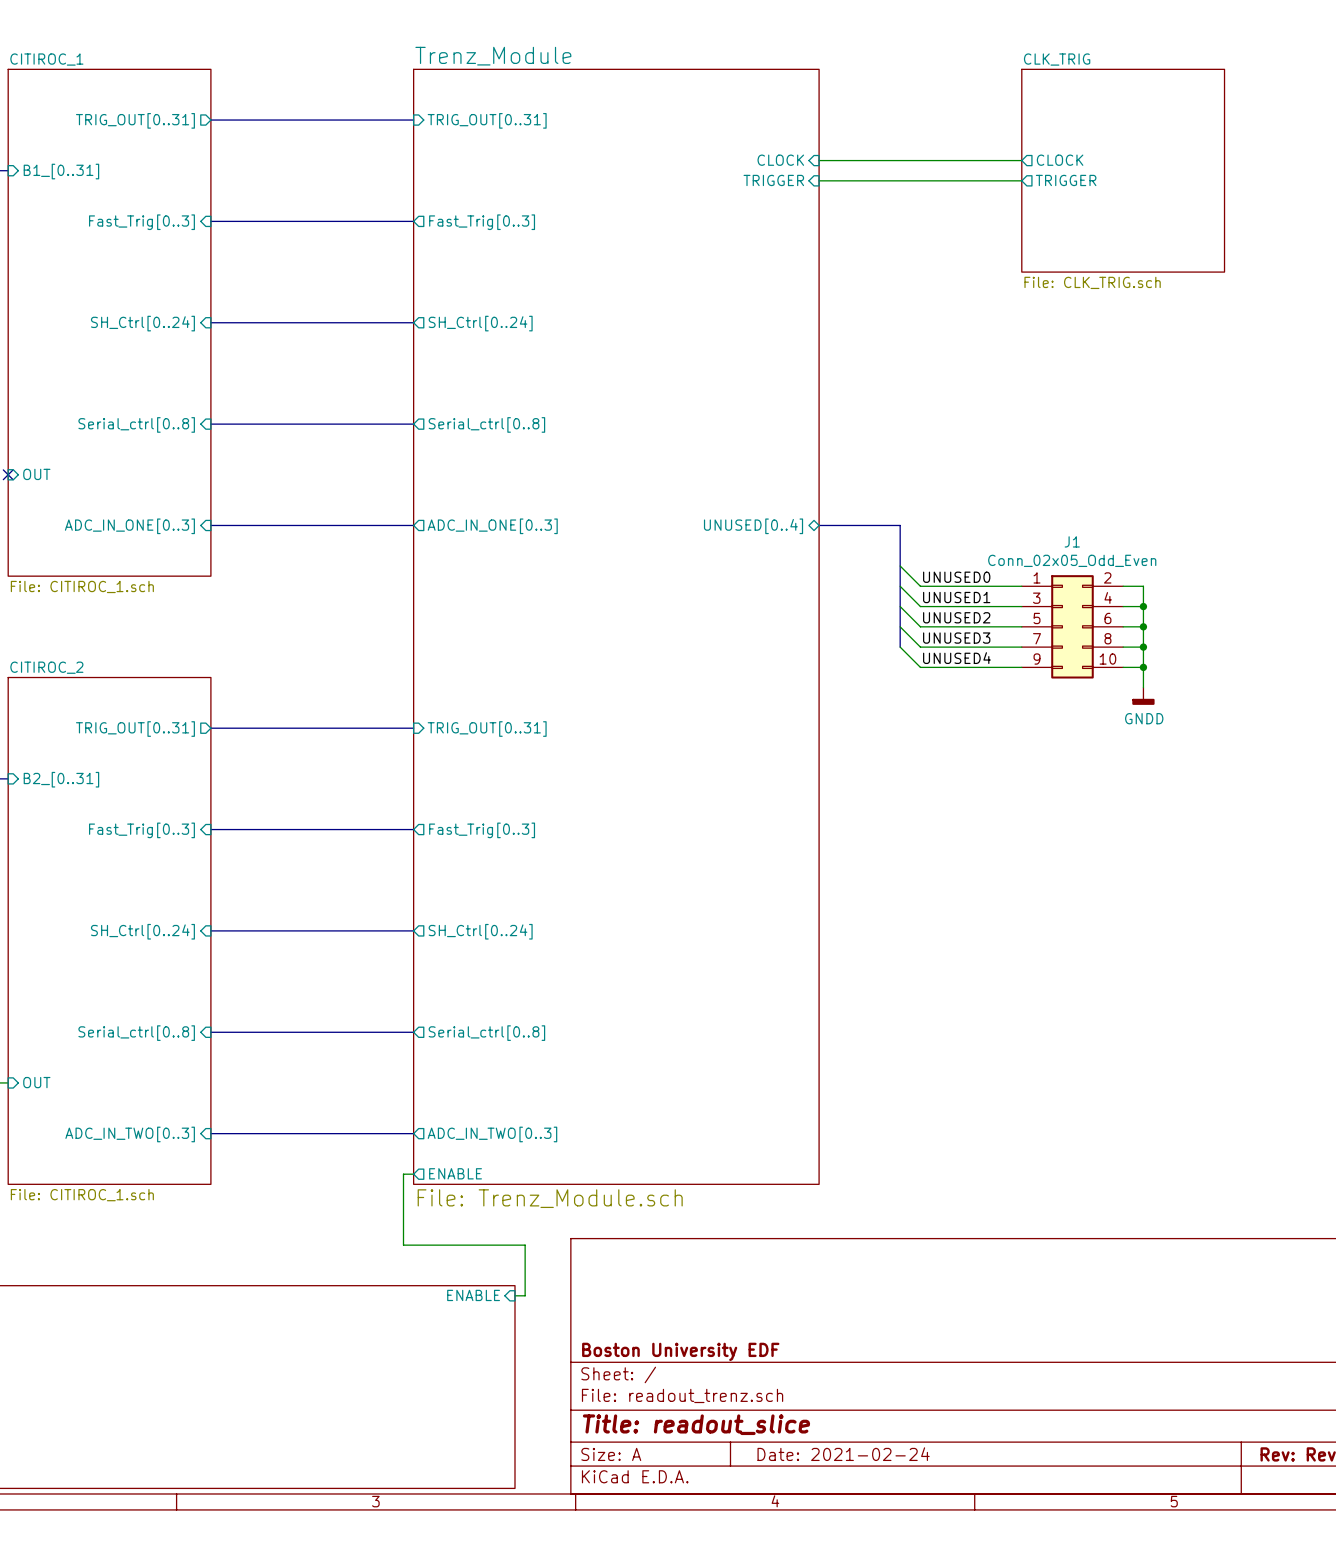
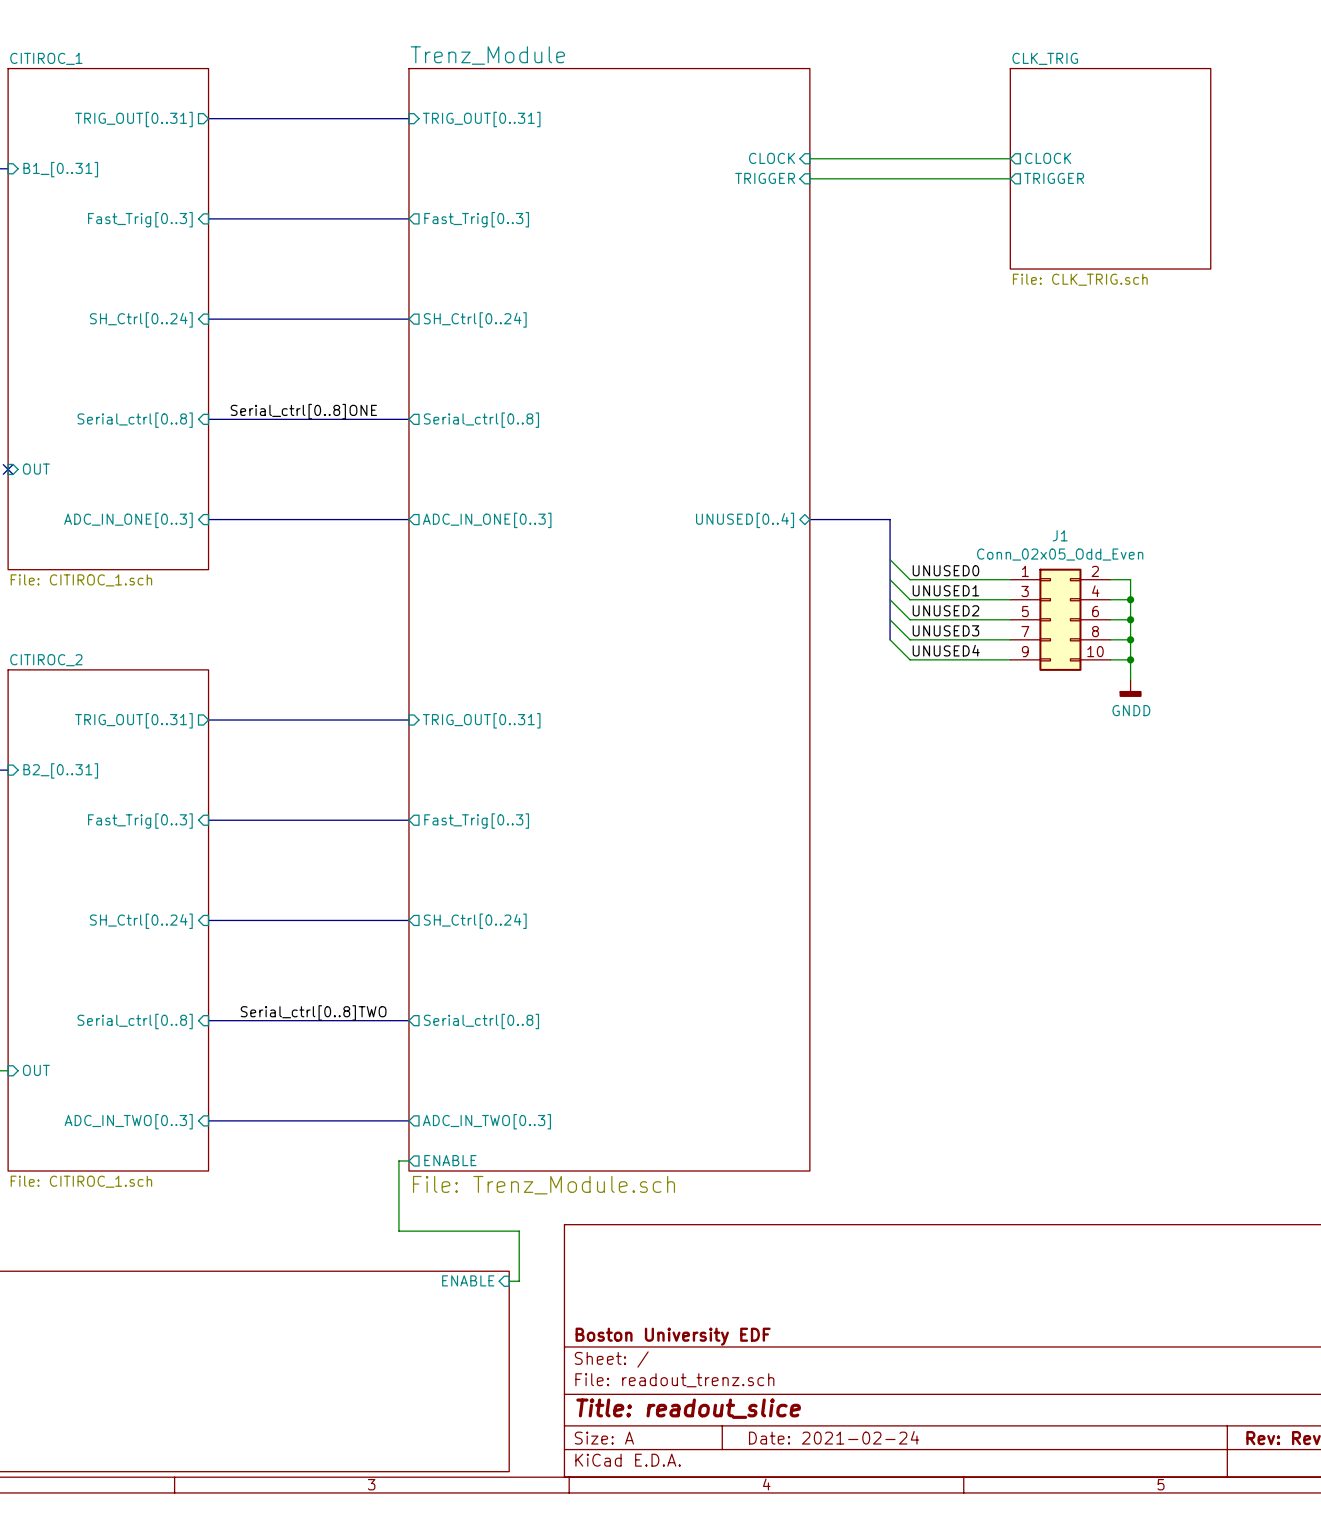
label: none -> Serial_ctrl[0..8]ONE (303, 411)
label: none -> Serial_ctrl[0..8]TWO (313, 1012)

